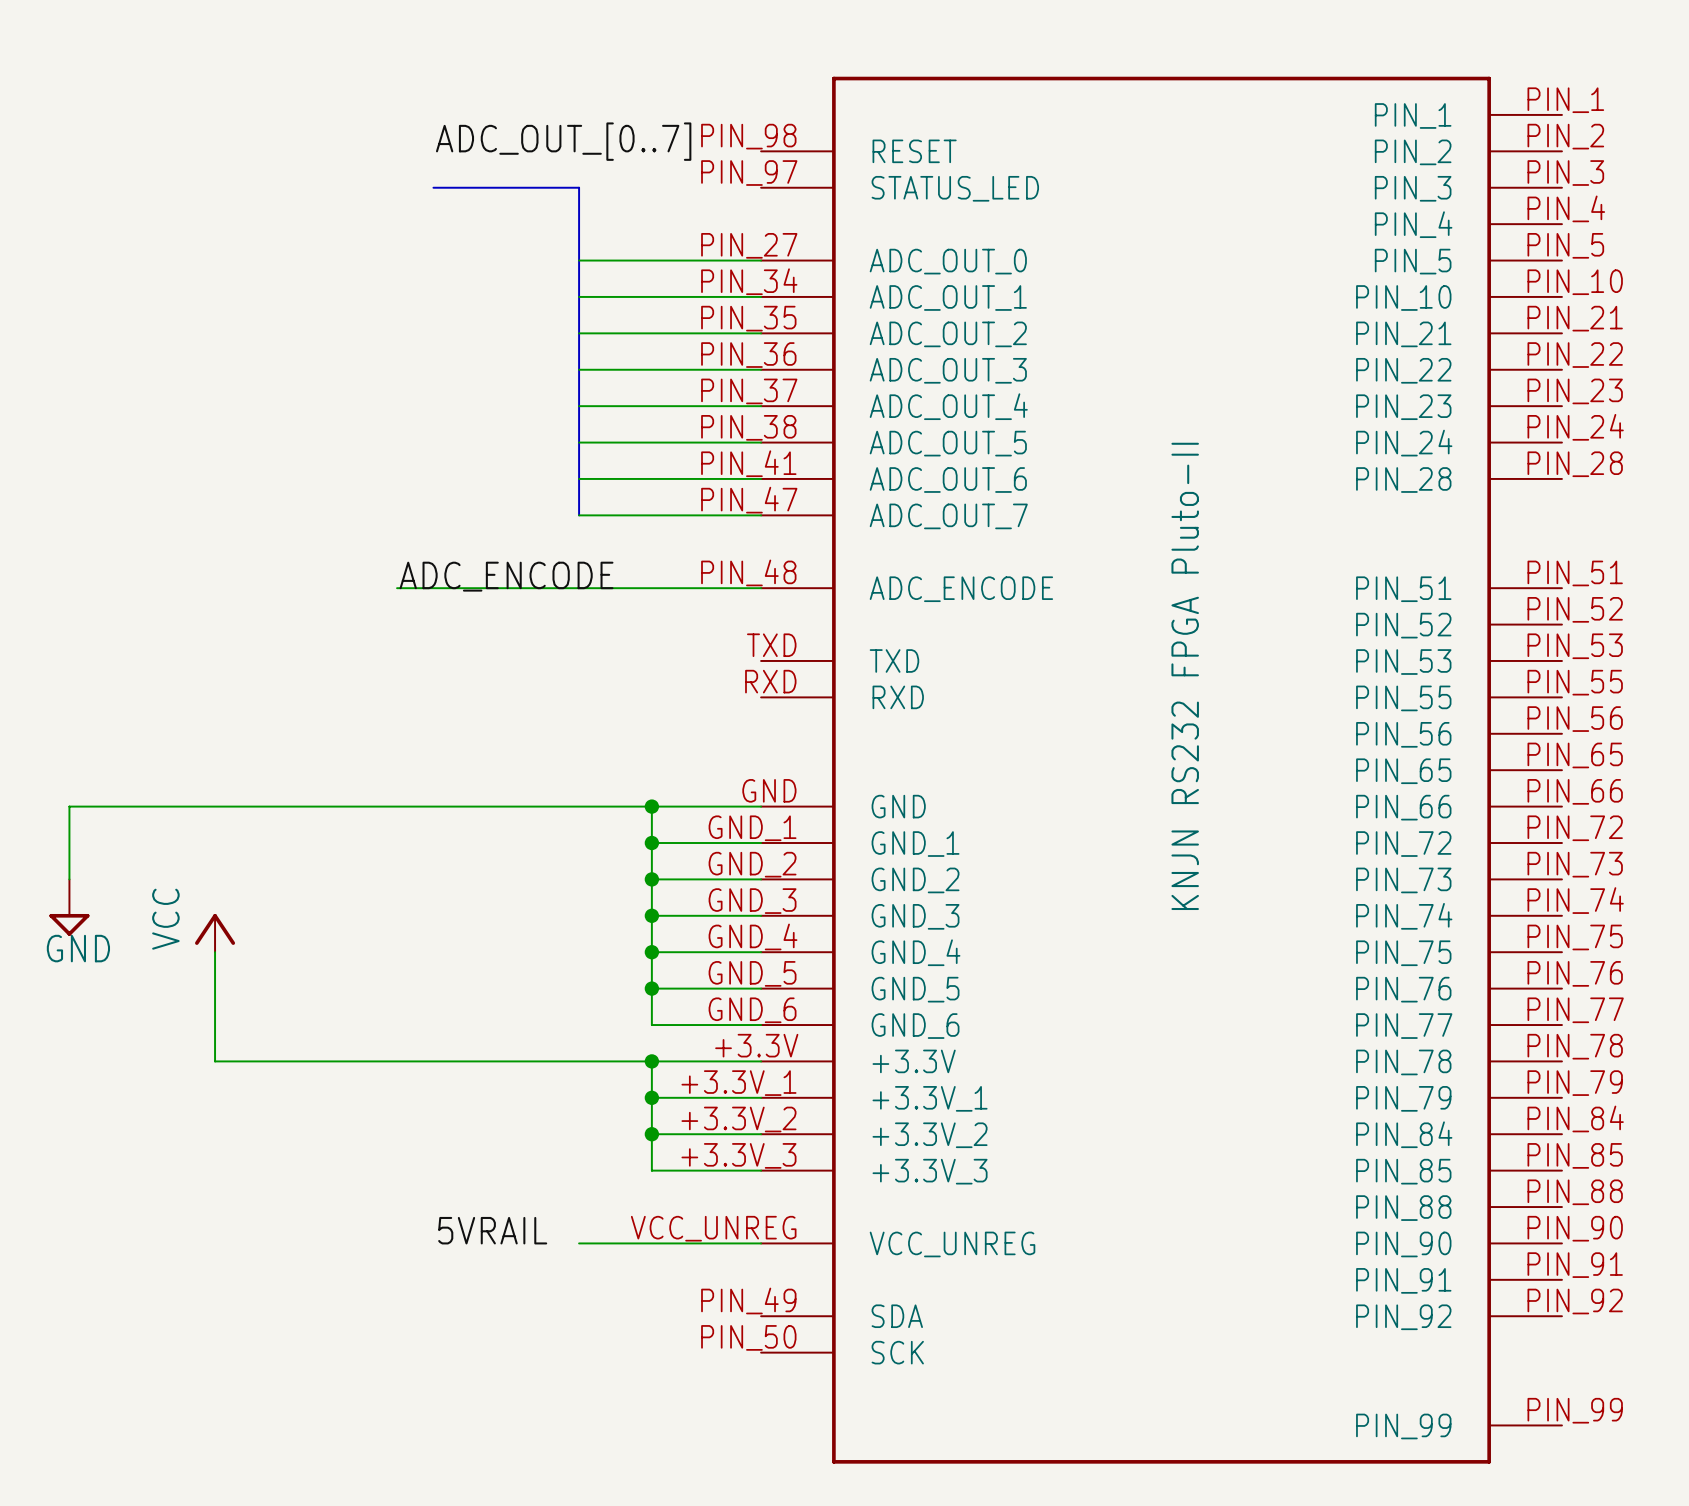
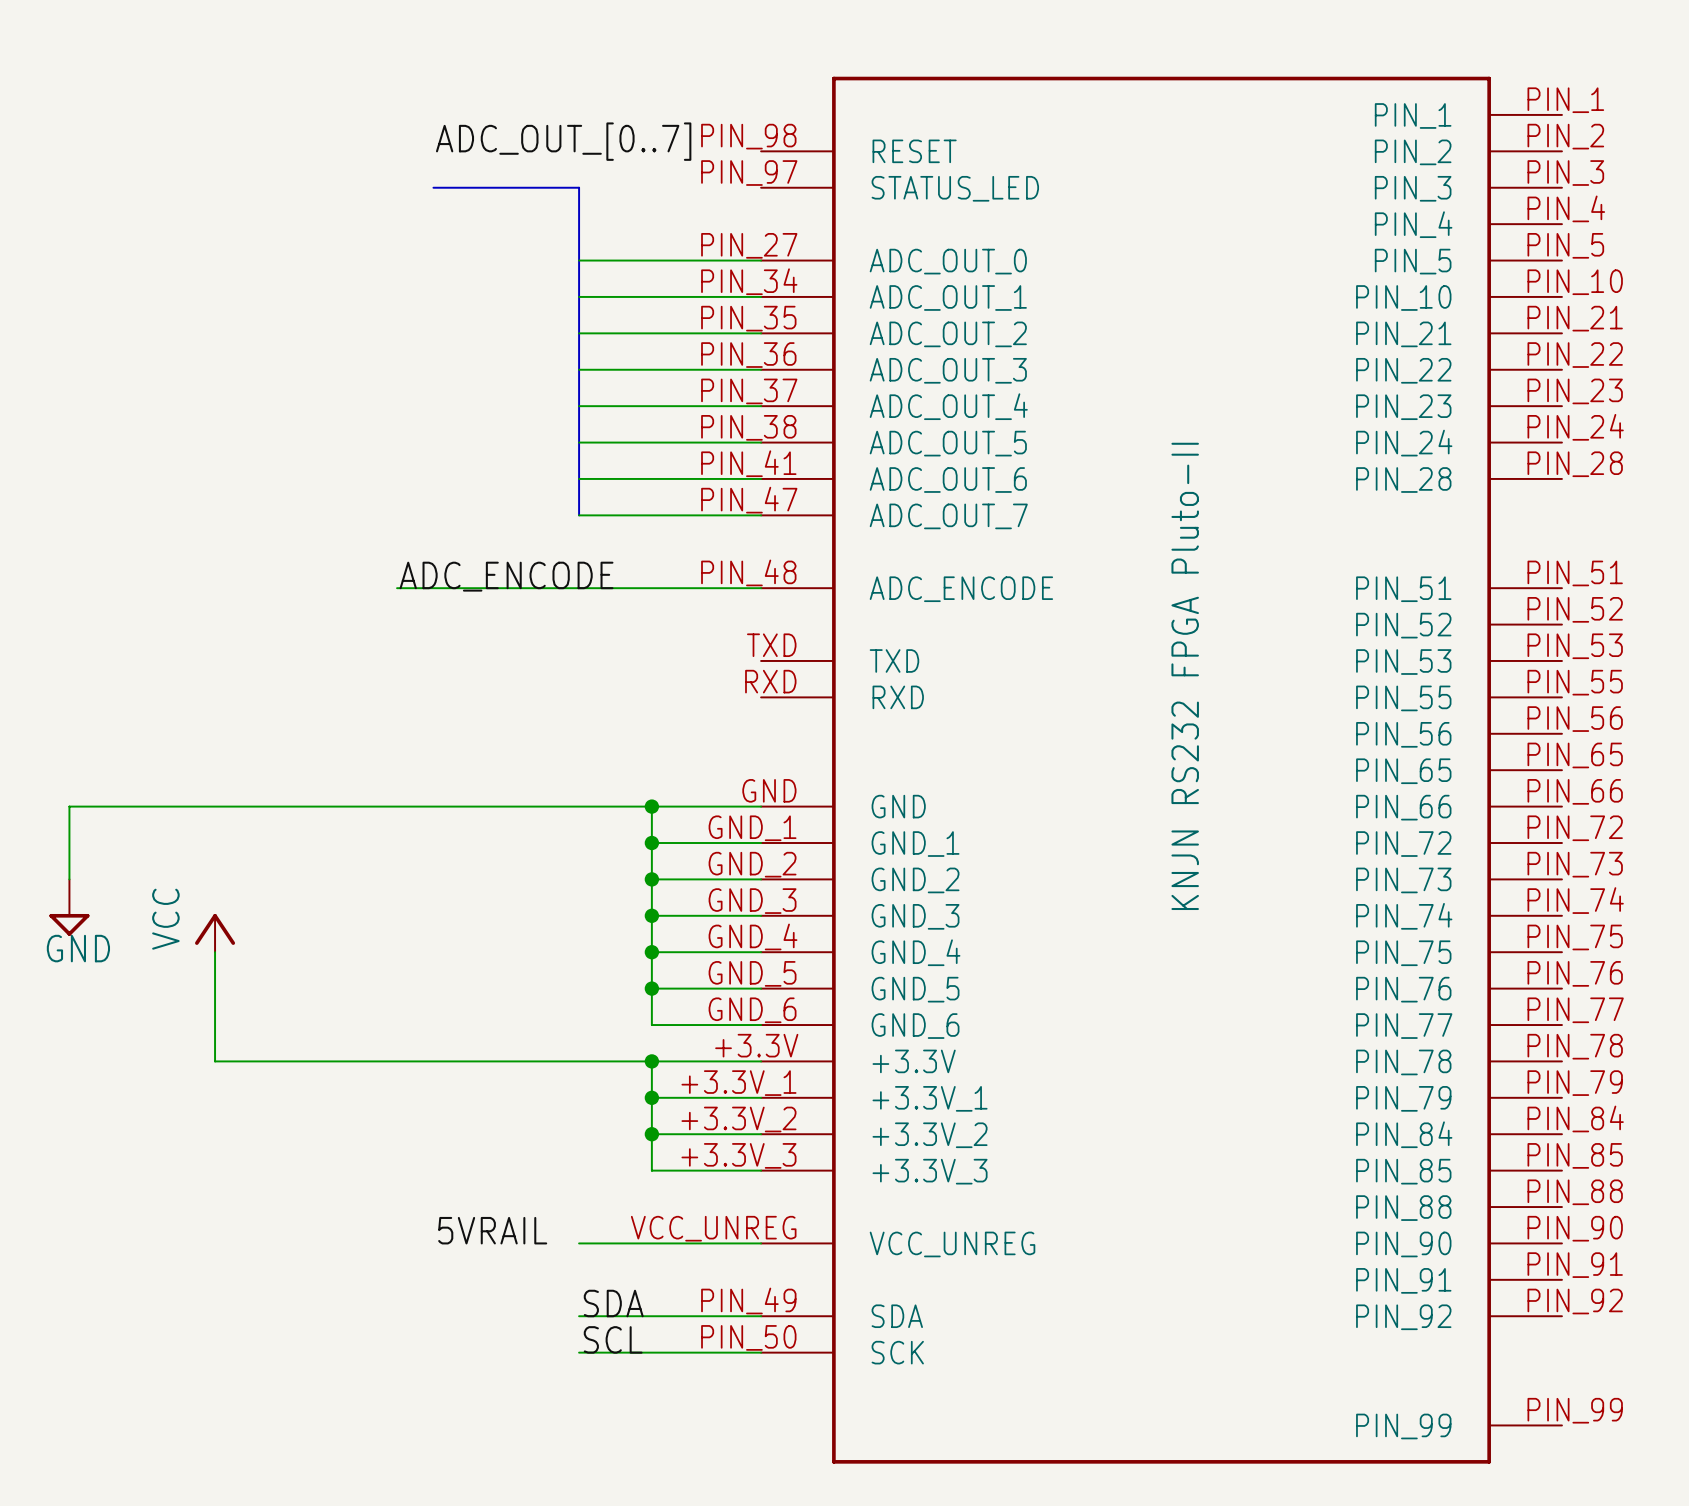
label: none -> SDA (613, 1303)
wire: none -> (579, 1316) (761, 1316)
label: none -> SCL (613, 1339)
wire: none -> (579, 1352) (761, 1352)

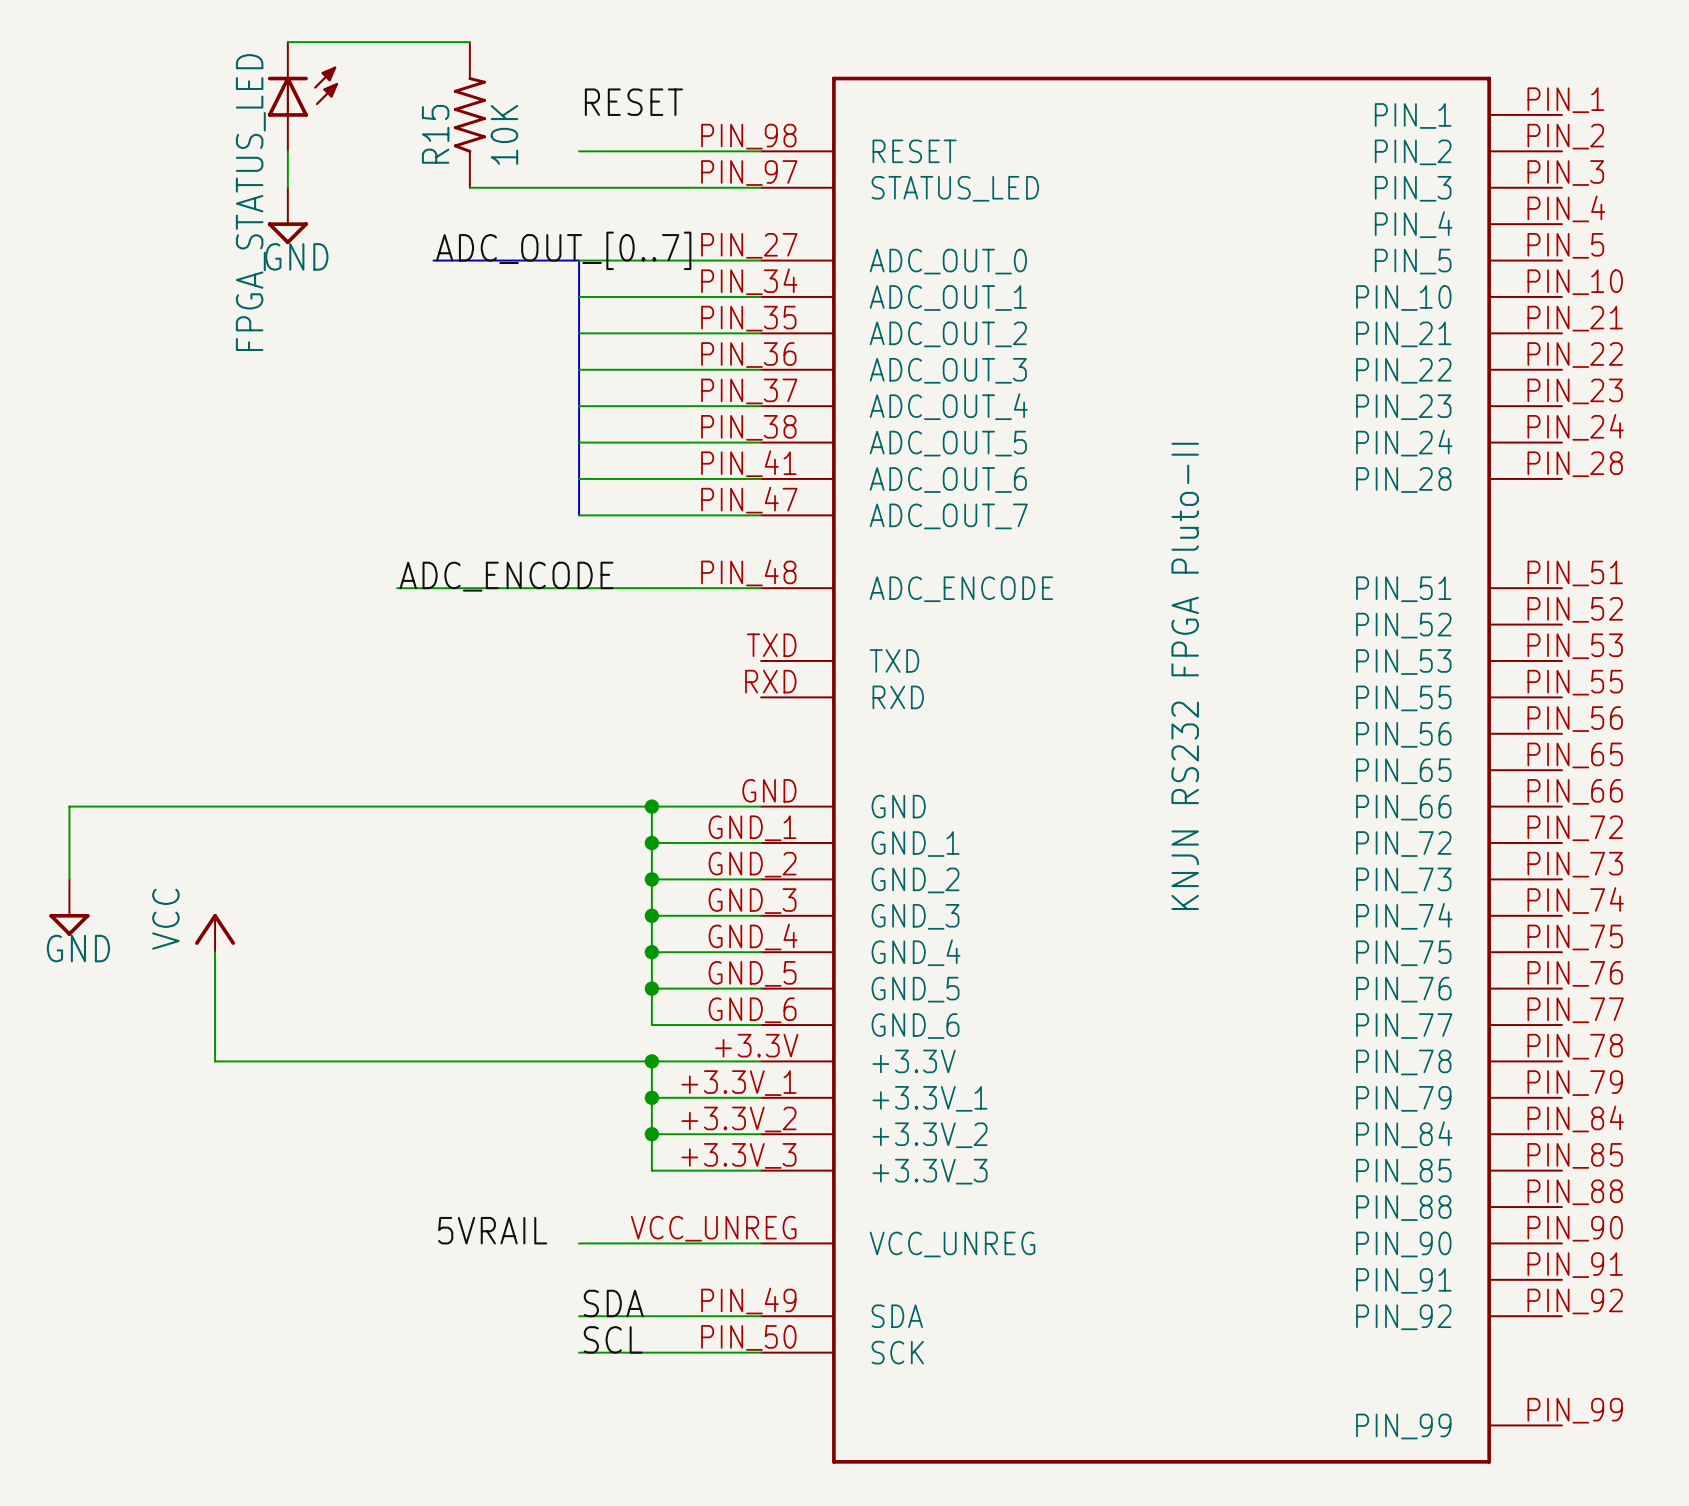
wire: none -> (287, 42) (469, 42)
FPGA_STATUS_LED: none -> (302, 96)
label: none -> RESET (633, 102)
R15: none -> 10K (469, 114)
label position: ADC_OUT_[0..7] (563, 141) -> ADC_OUT_[0..7] (563, 250)
wire: none -> (287, 151) (287, 187)
wire: none -> (579, 151) (761, 151)
bus: (433, 187) (579, 187) (579, 260) -> (433, 260) (579, 260)
wire: none -> (469, 187) (761, 187)
power symbol: none -> GND (287, 215)

